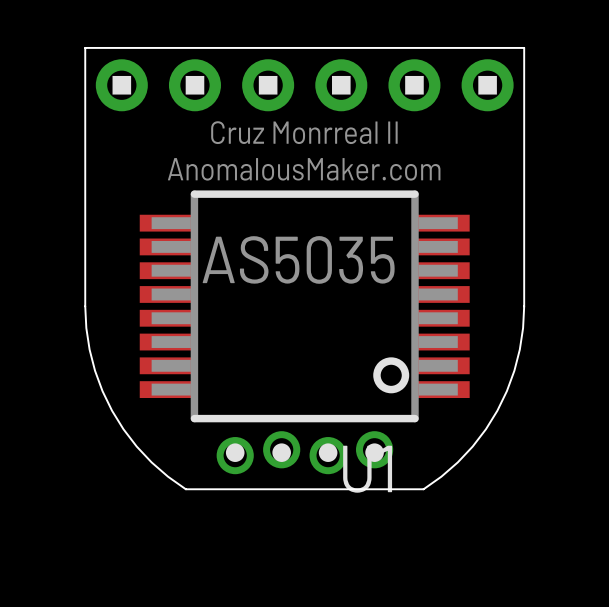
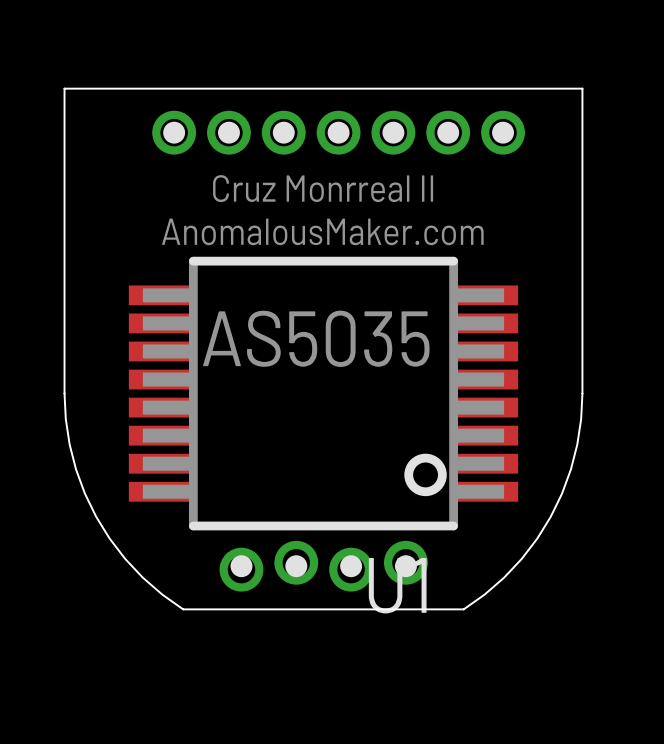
part footprint: [95, 59, 514, 112] -> [152, 110, 525, 155]

